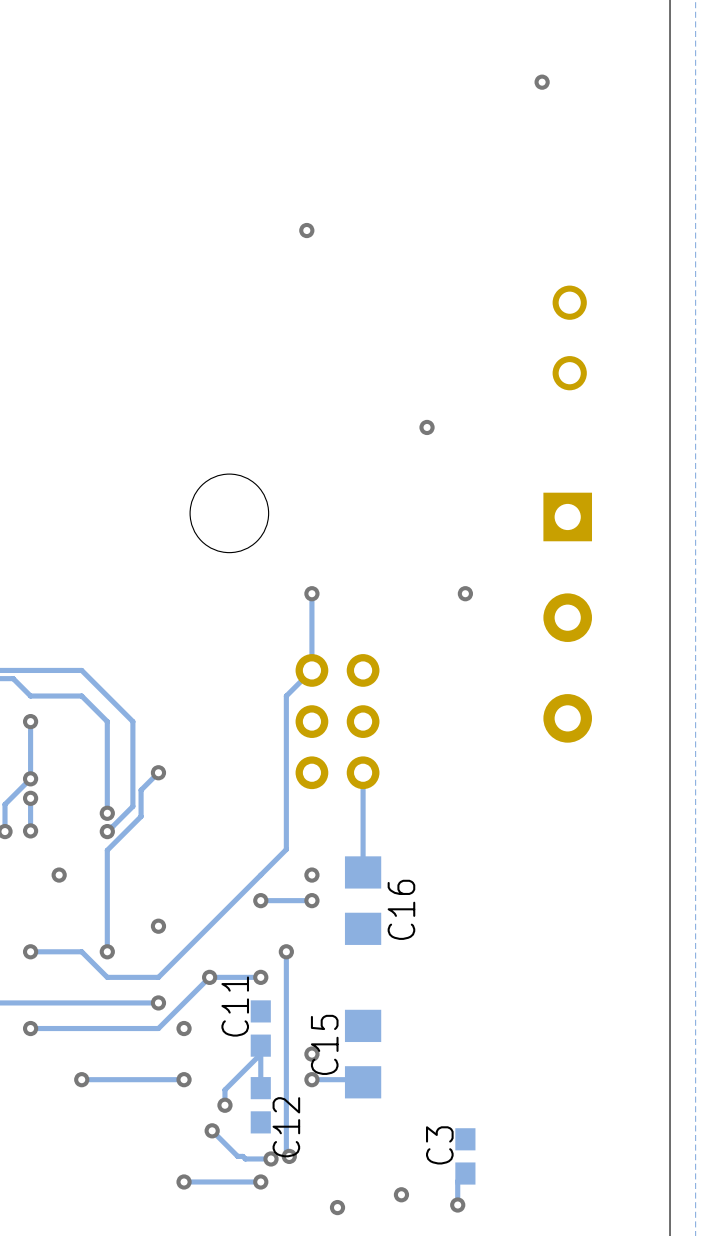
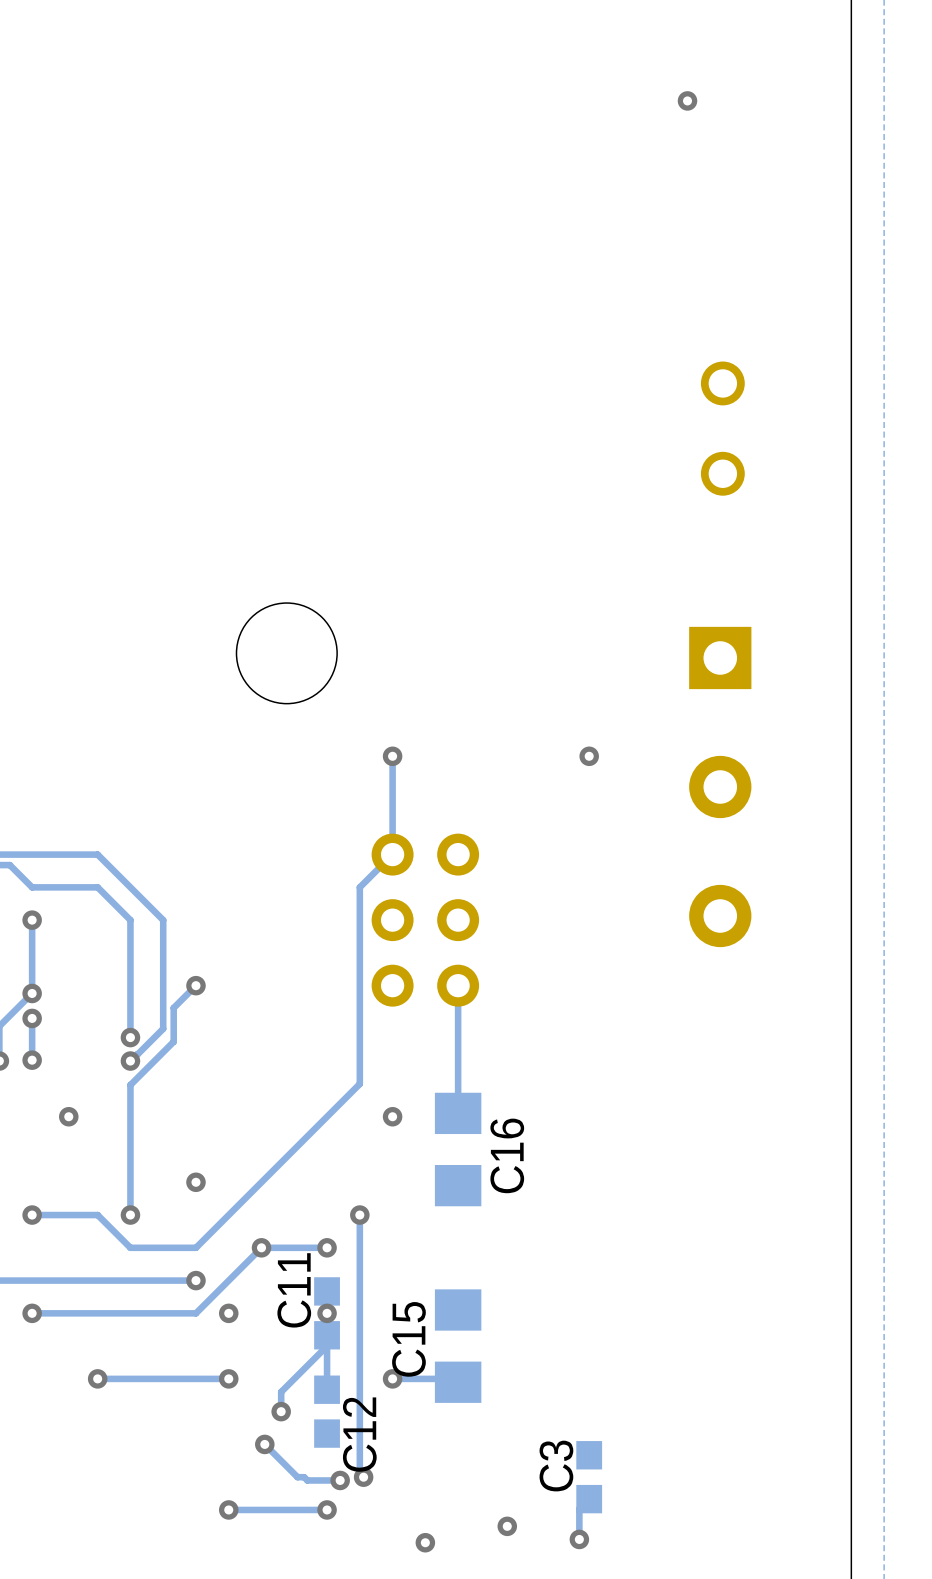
via: (306, 230) -> none
via: (427, 427) -> none
via: (260, 900) -> none
track: (311, 900) (260, 900) -> none
via: (311, 900) -> none
via position: (311, 1054) -> (327, 1313)

